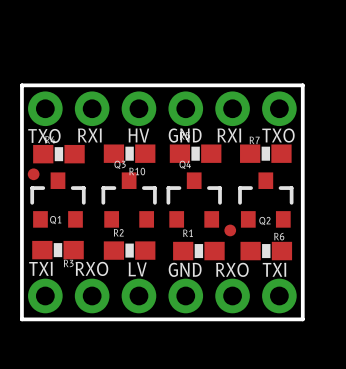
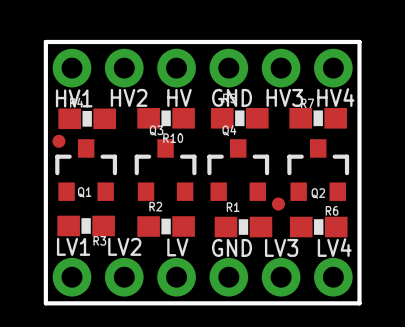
text: TXO (44, 135) -> HV1 (74, 98)
text: RXI (89, 135) -> HV2 (129, 97)
text: RXI (229, 135) -> HV3 (284, 97)
text: TXO (278, 135) -> HV4 (335, 97)
text: TXI (40, 268) -> LV1 (73, 246)
text: RXO (91, 268) -> LV2 (124, 246)
text: RXO (232, 269) -> LV3 (281, 247)
text: TXI (274, 269) -> LV4 (334, 247)

